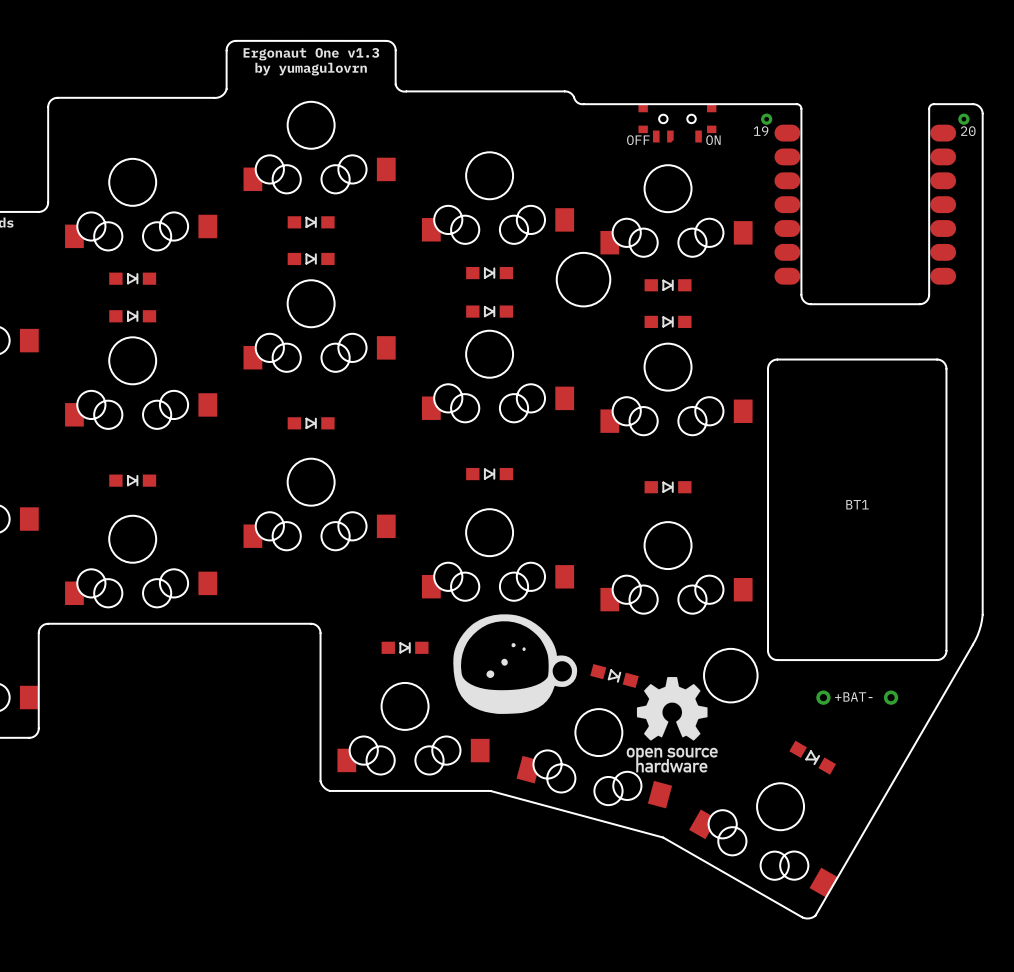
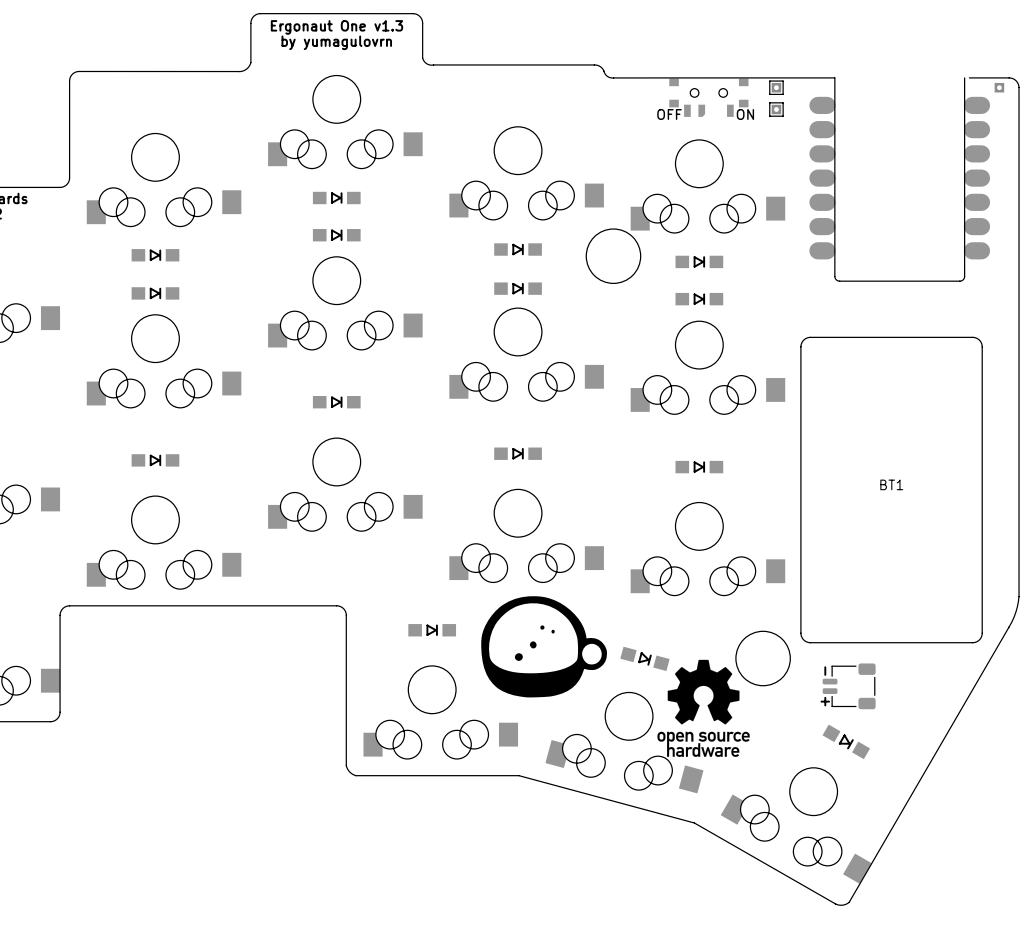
part footprint: [761, 103, 970, 305] -> [809, 77, 991, 282]
part: none -> (776, 87)
part: none -> (999, 87)
part: none -> (776, 109)
BT1 footprint: [767, 358, 948, 705] -> [800, 336, 983, 644]
part: none -> (848, 686)

